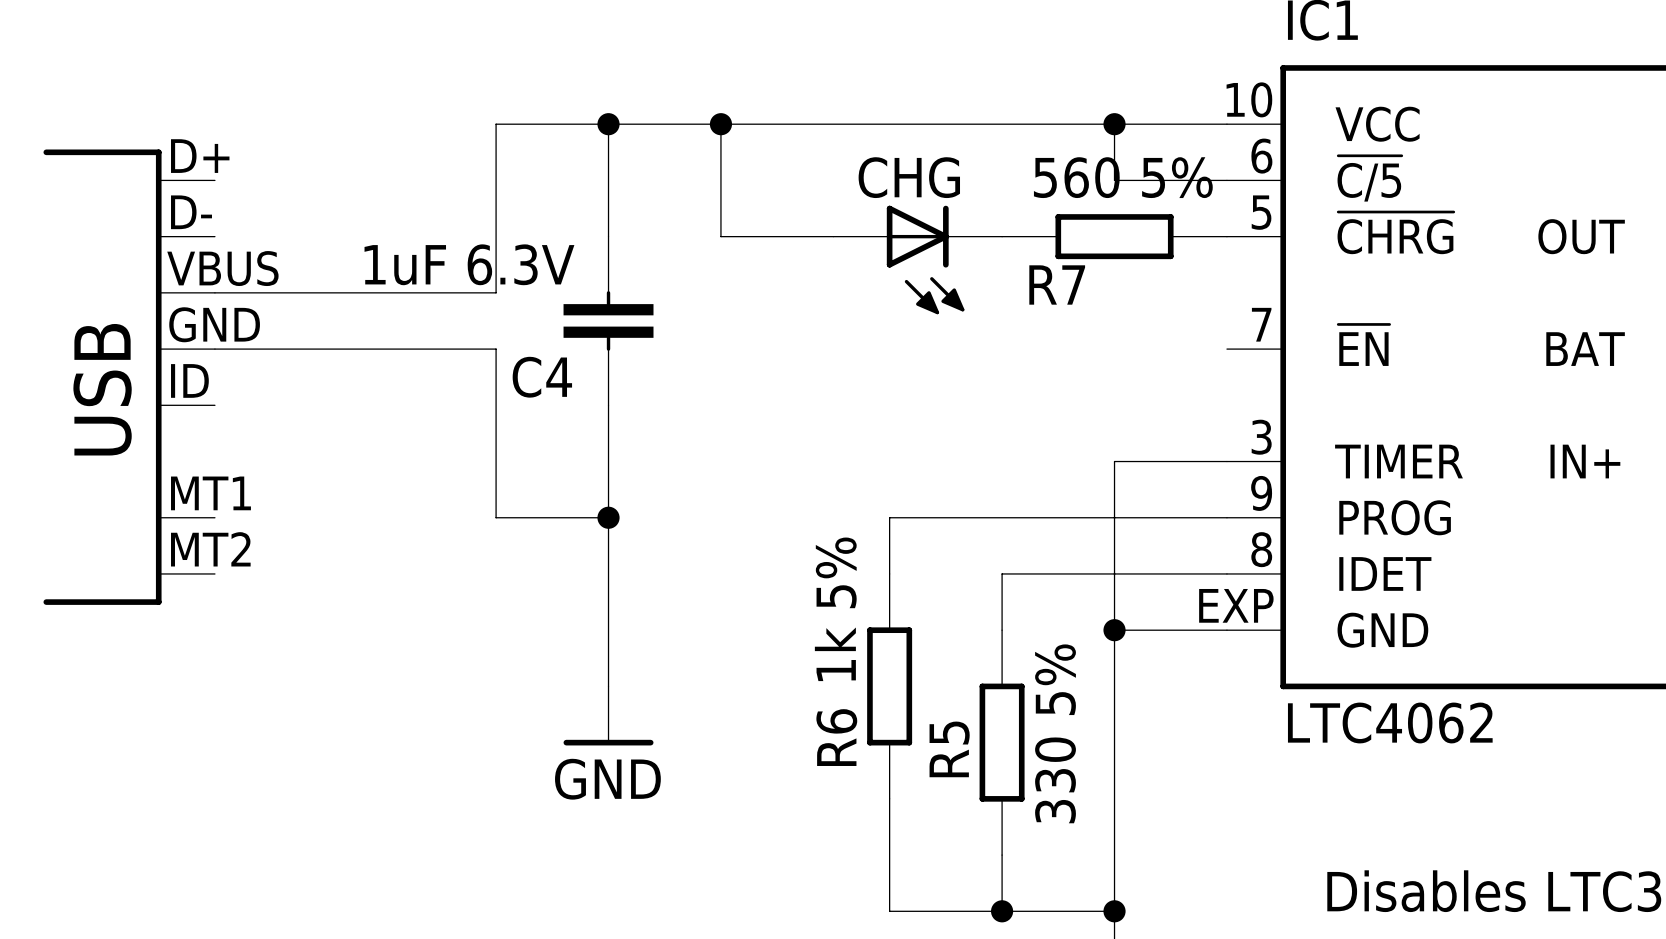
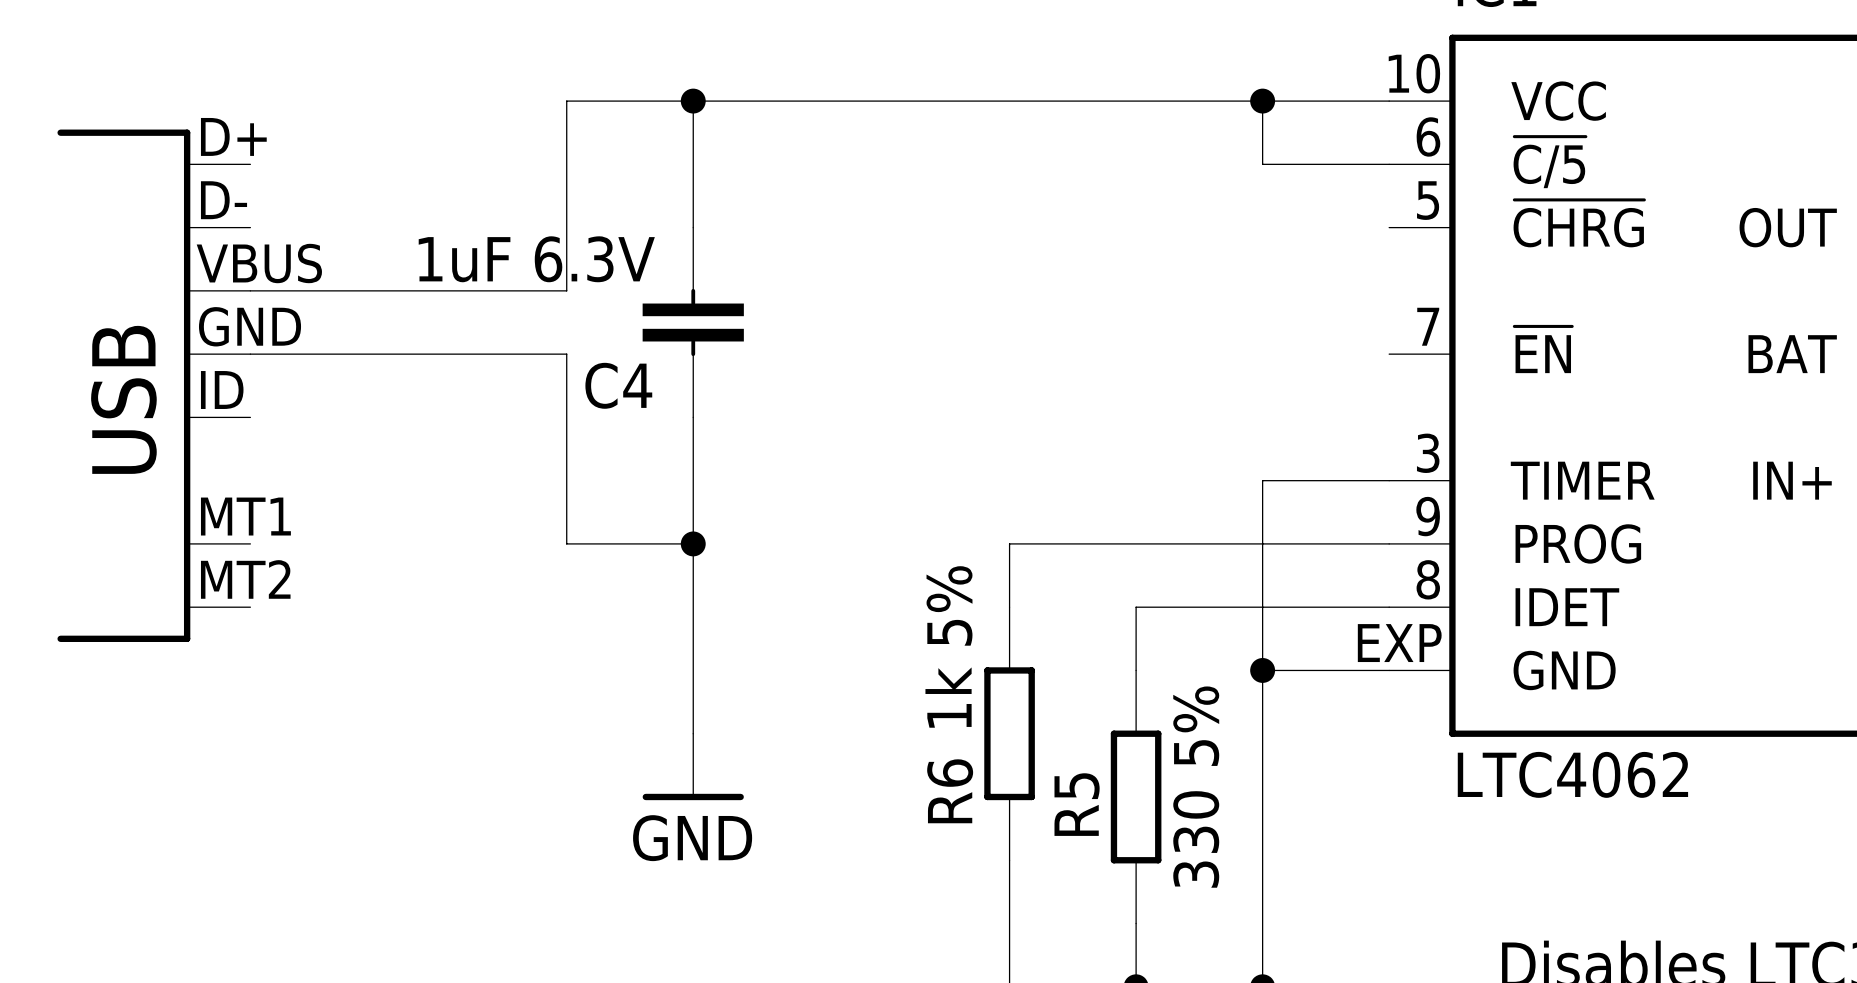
wire: (720, 124) (720, 236) (833, 236) -> none
junction: (720, 124) -> none
R7: 560 5% (1114, 236) -> none
CHG: (917, 259) -> none

